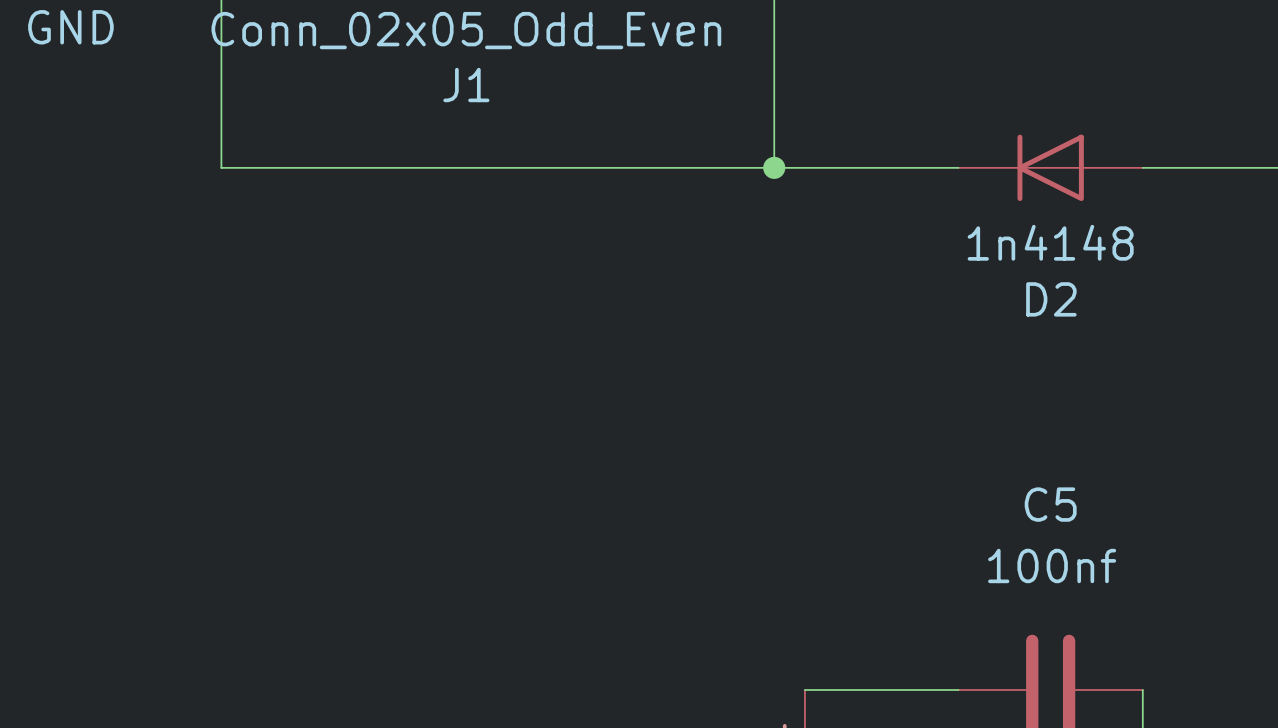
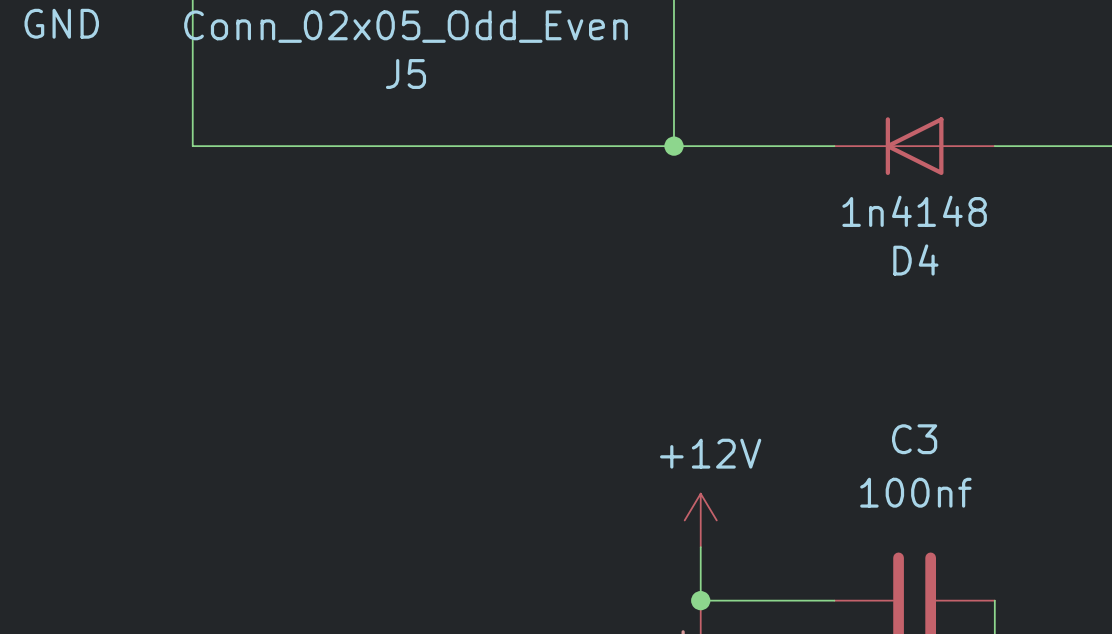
J1 name: J1 (466, 85) -> J5 (405, 74)
D2 name: D2 (1051, 299) -> D4 (915, 259)
C5 name: C5 (1050, 504) -> C3 (914, 439)
power symbol: none -> +12V (700, 520)
wire: none -> (700, 547) (700, 600)
junction: none -> (700, 600)

